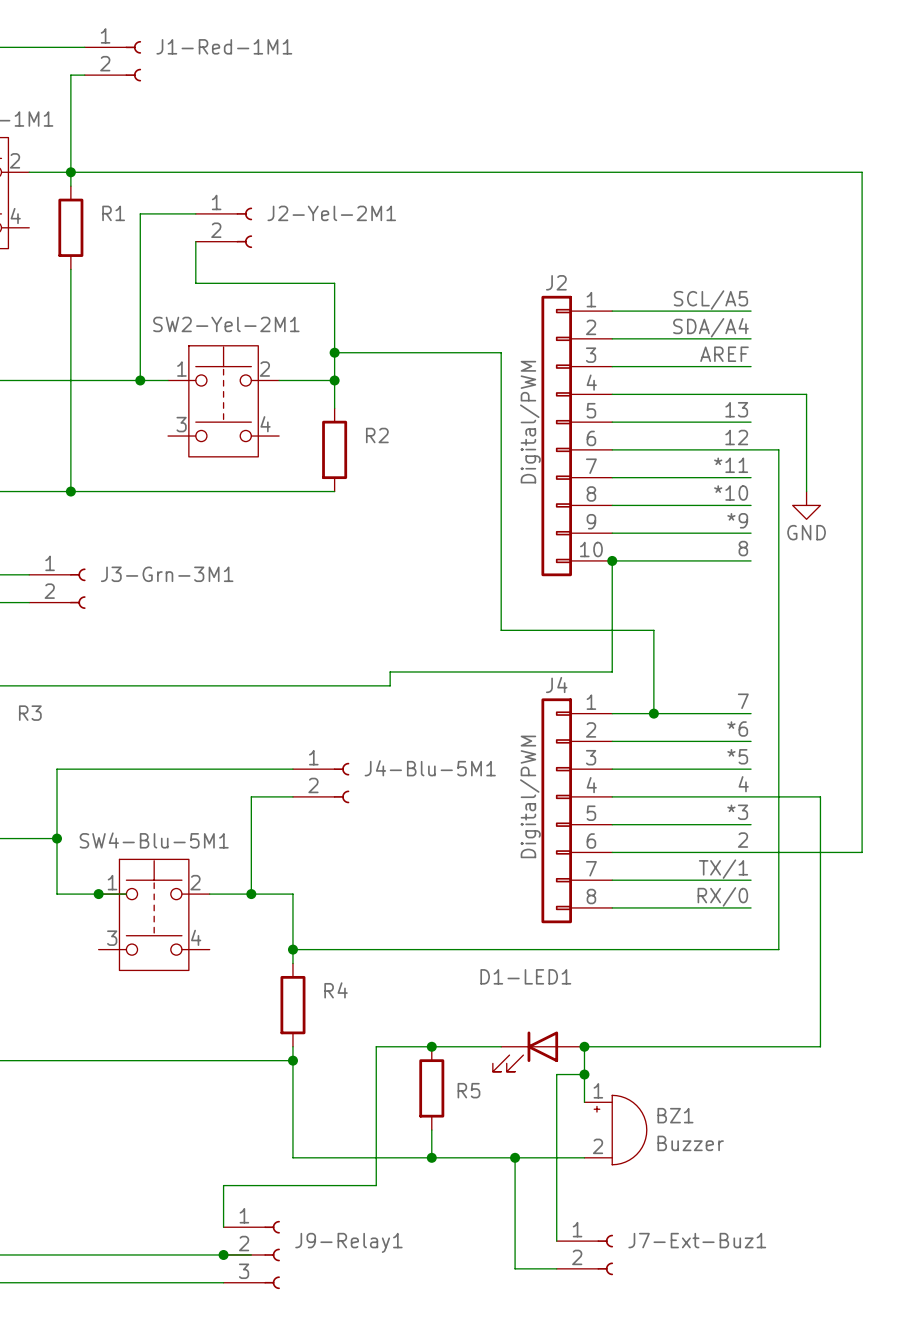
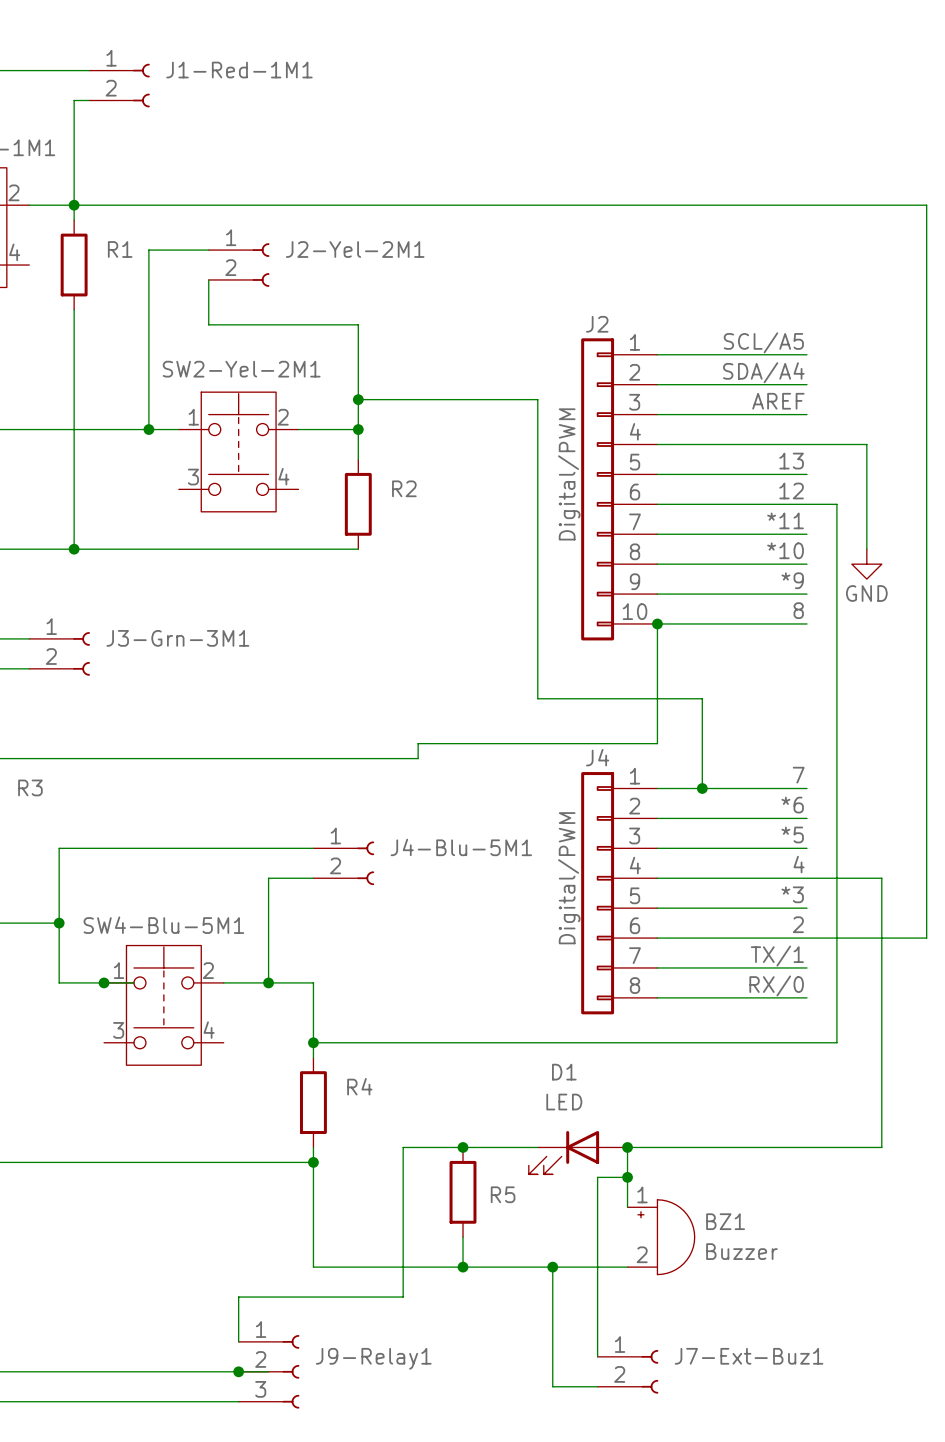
D1-LED1 name: D1-LED1 (525, 976) -> D1 (564, 1072)
D1-LED1 value: none -> LED (564, 1102)

